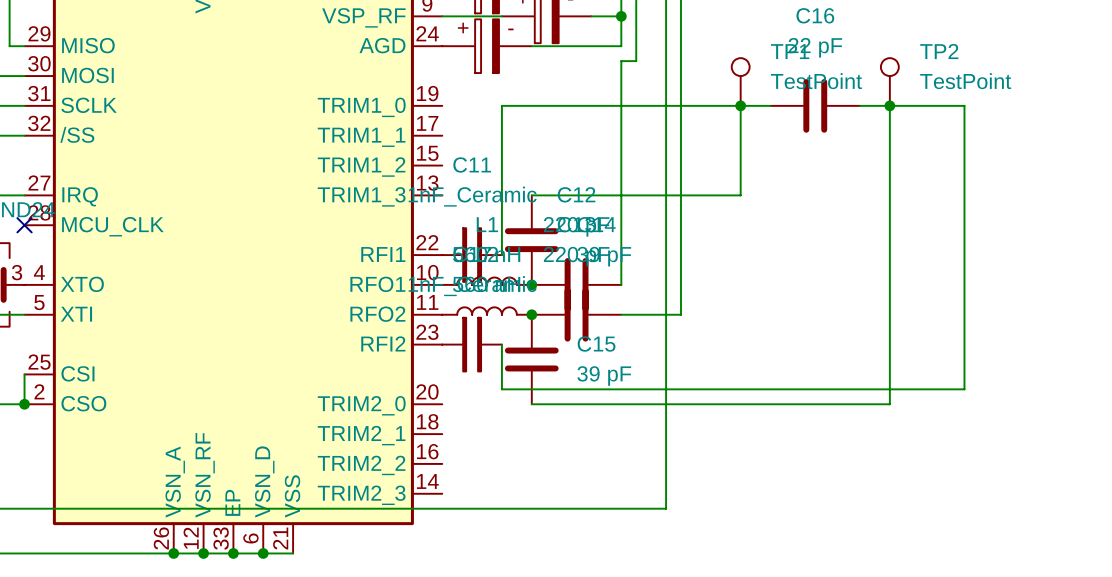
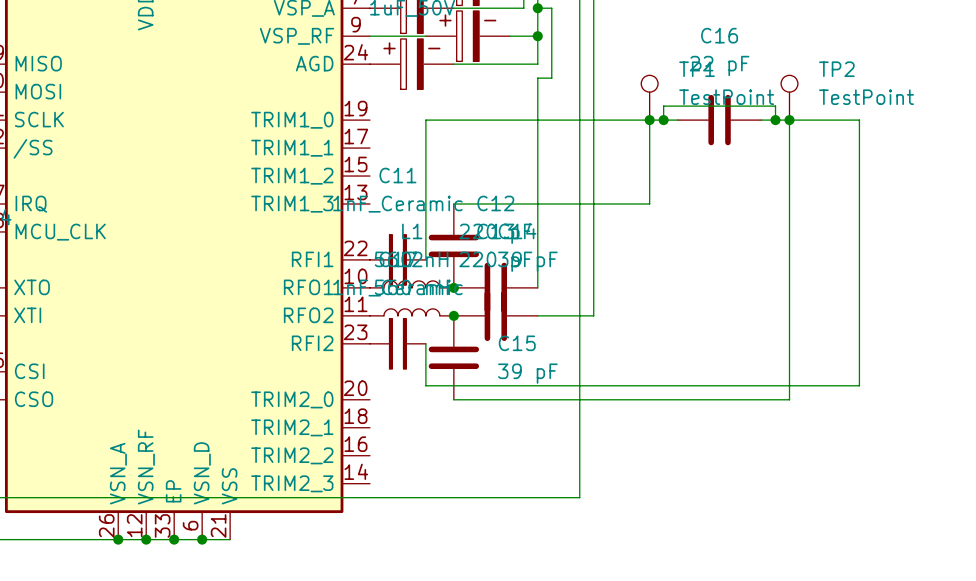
wire: none -> (663, 120) (663, 106) (775, 106) (775, 120)
junction: none -> (663, 120)
junction: none -> (775, 120)

